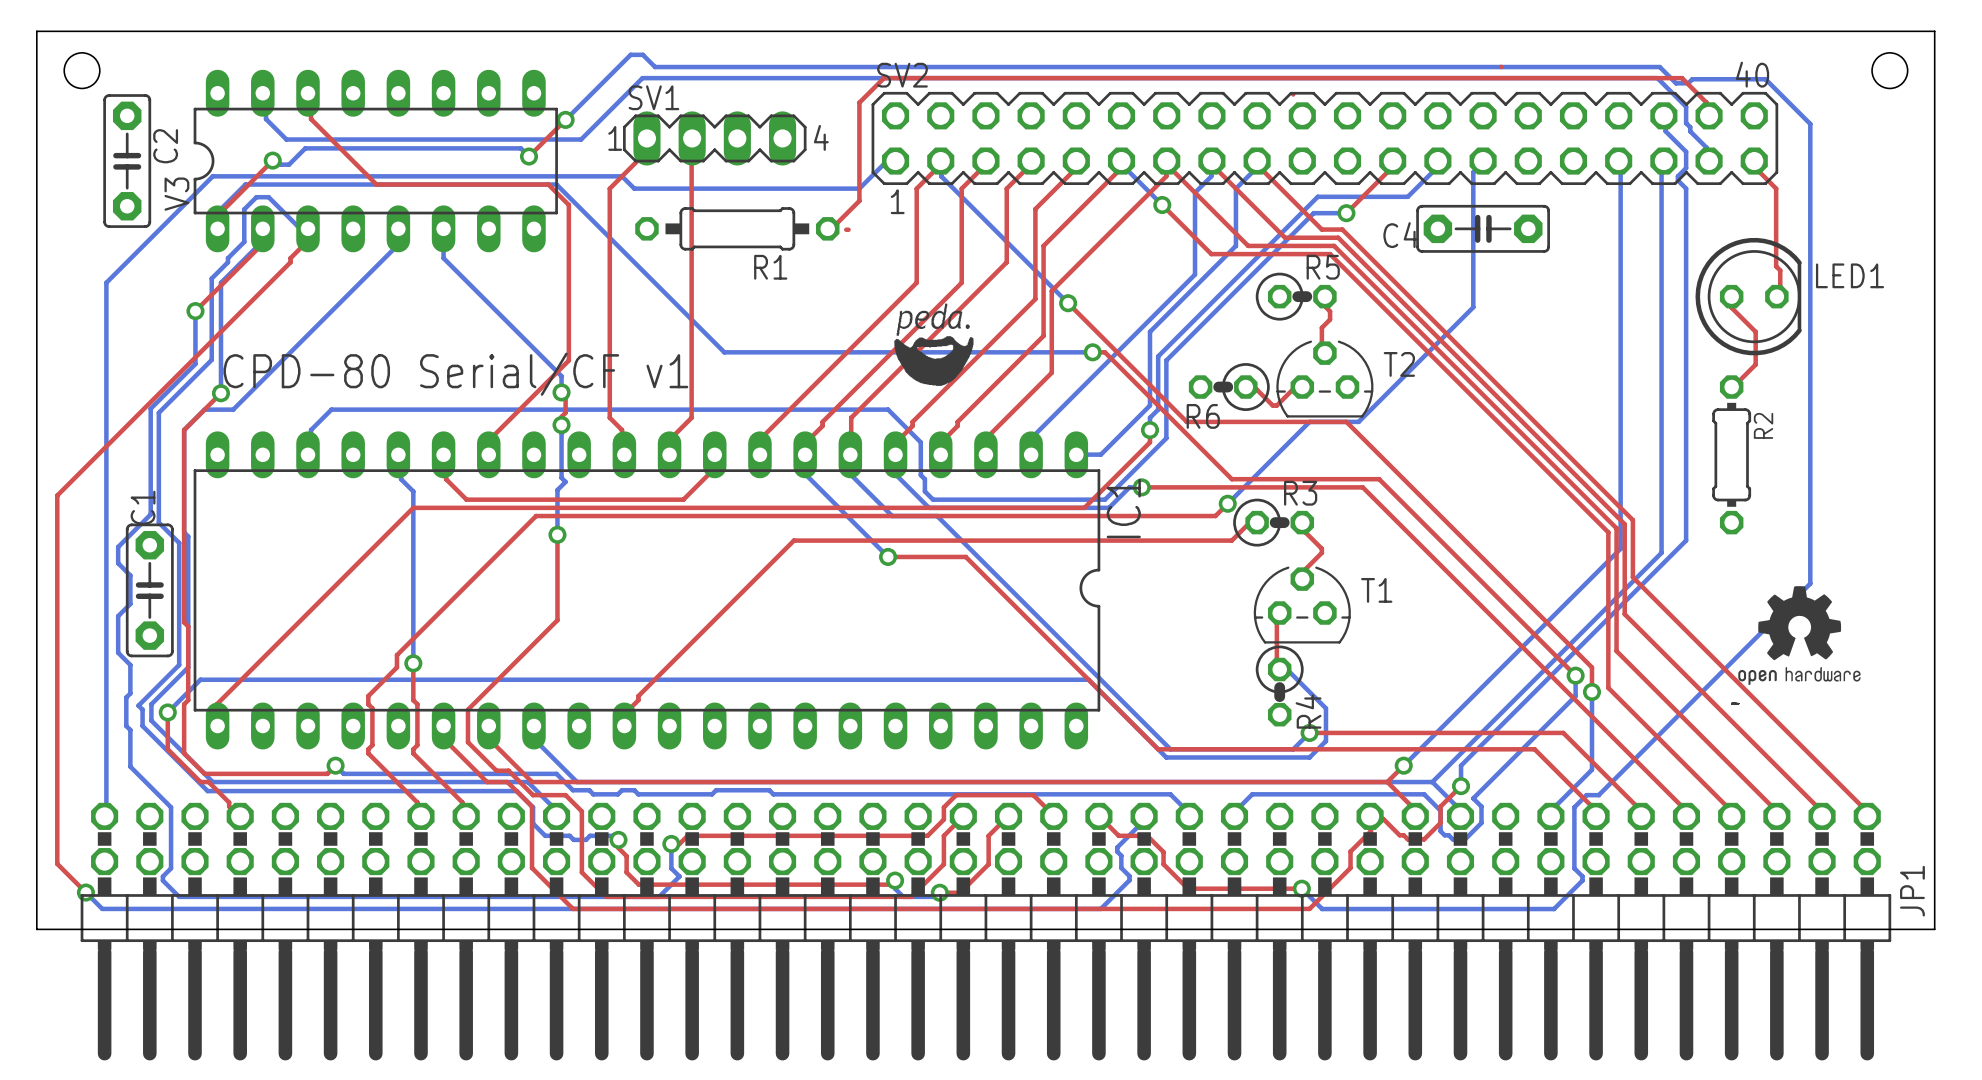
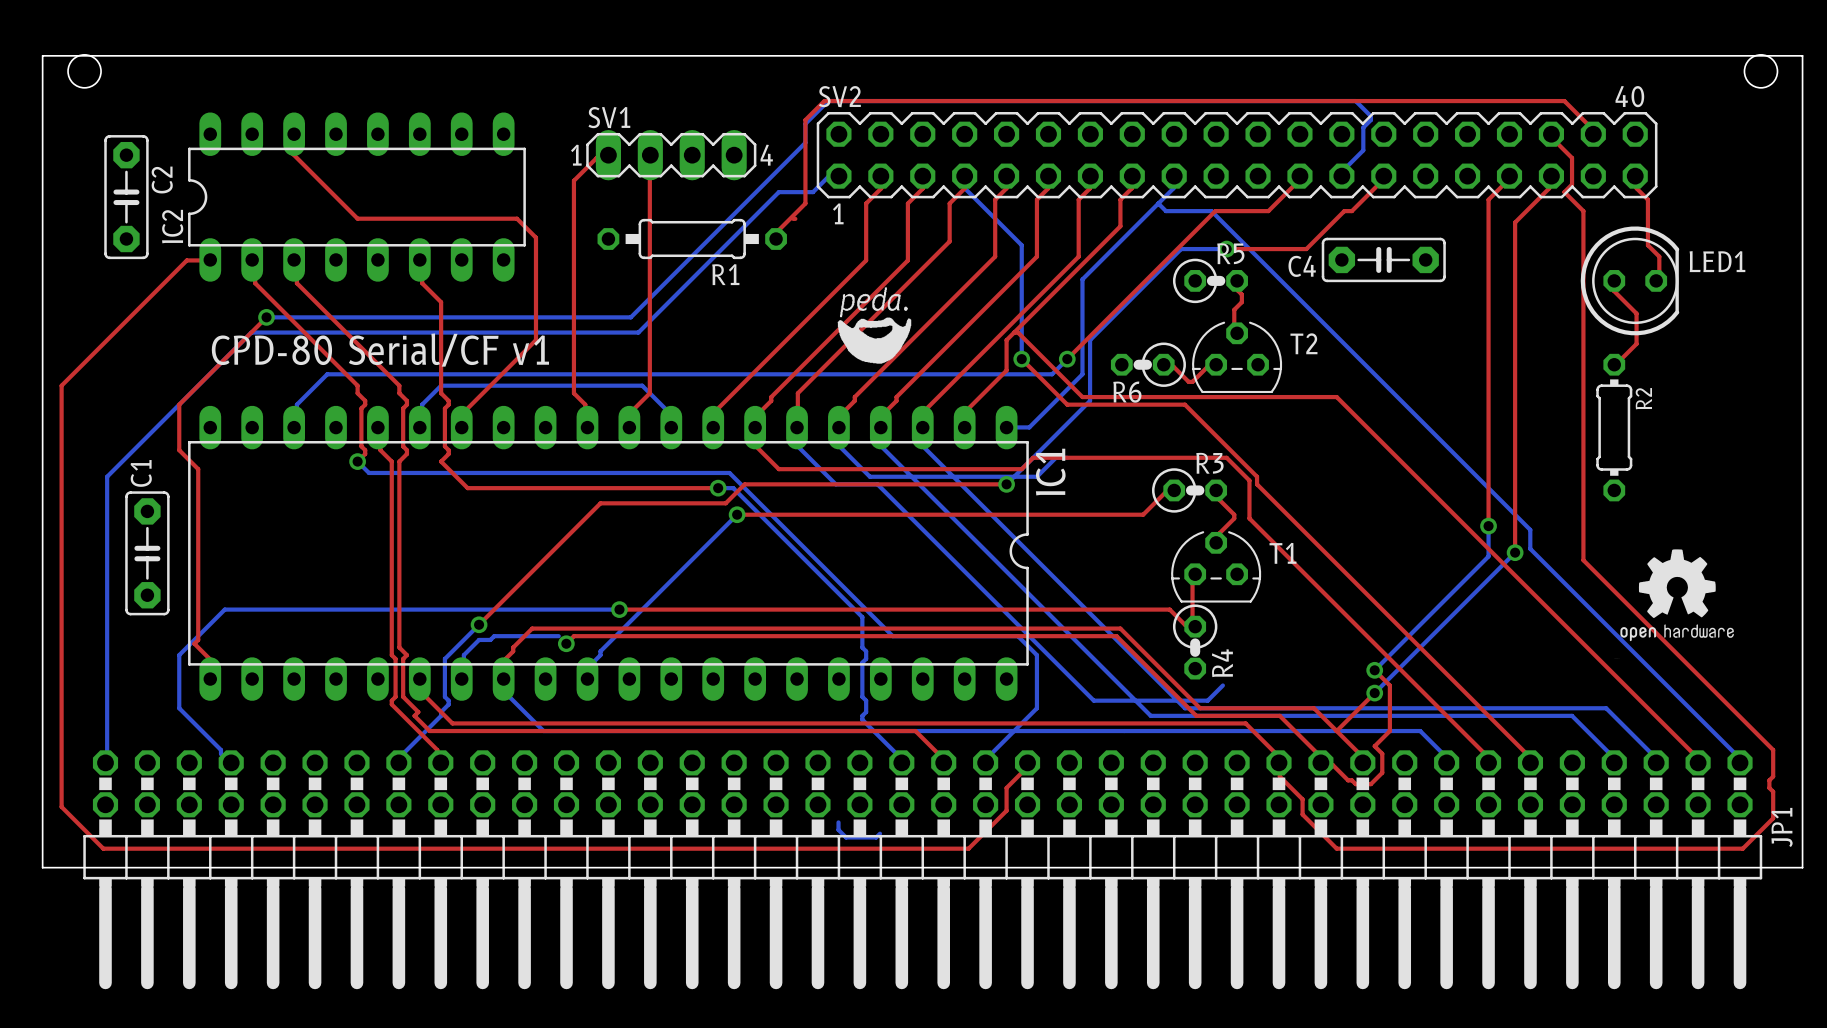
board edge: (36, 53) (36, 31) (1934, 31) (1934, 53) -> (42, 55) (1802, 55)
bottom track: (262, 93) (266, 94) (266, 119) (286, 139) (581, 139) (642, 78) (1657, 78) (1686, 106) (1686, 123) (1690, 127) (1690, 131) (1706, 147) (1706, 159) (1709, 161) -> none
top track: (307, 93) (311, 94) (311, 119) (376, 184) (548, 184) (568, 205) (568, 250) -> (294, 134) (293, 154) (357, 218) (517, 218) (535, 237)
bottom track: (1663, 115) (1665, 131) (1686, 151) (1686, 168) (1677, 176) (1677, 180) (1686, 188) (1686, 540) (1461, 765) (1461, 786) -> none
top track: (1709, 115) (1706, 114) (1706, 102) (1682, 78) (883, 78) (859, 102) (859, 123) -> (1593, 134) (1594, 131) (1564, 101) (824, 101) (805, 120)
top track: (565, 119) (529, 156) -> none
bottom track: (565, 119) (630, 54) (642, 54) (655, 67) (1659, 67) (1676, 83) (1688, 83) (1692, 79) (1765, 79) (1810, 123) (1810, 583) (1598, 795) (1586, 795) (1574, 807) (1574, 868) (1582, 876) (1582, 880) (1554, 909) (1322, 909) (1301, 888) -> none
via: (565, 119) -> none
SV1 position: (714, 138) -> (671, 155)
SV2 position: (1324, 138) -> (1237, 155)
bottom track: (529, 156) (520, 148) (305, 148) (289, 164) (280, 164) (276, 160) (272, 160) -> none
via: (529, 156) -> none
top track: (272, 160) (219, 213) (219, 225) (217, 228) -> none
via: (272, 160) -> none
C2 position: (127, 161) -> (126, 197)
V3: (375, 161) -> none
bottom track: (895, 161) (892, 164) (883, 164) (859, 188) (634, 188) (622, 176) (212, 176) (106, 282) (106, 507) -> none
top track: (940, 161) (941, 164) (916, 188) (916, 282) -> (880, 176) (881, 188) (866, 203) (866, 260) (858, 268)
bottom track: (940, 161) (941, 176) (1068, 303) -> none
top track: (985, 161) (986, 164) (961, 188) (961, 282) -> (922, 176) (923, 188) (907, 203) (907, 260) (900, 268)
top track: (1031, 161) (1031, 164) (1006, 188) (1006, 262) -> (964, 176) (964, 188) (949, 203) (949, 241) (942, 249)
top track: (1076, 161) (1076, 168) (1035, 209) (1035, 299) -> (1006, 176) (1006, 188) (995, 199) (995, 256) (968, 283)
top track: (1121, 161) (1125, 164) (1043, 245) (1043, 335) -> (1048, 176) (1048, 188) (1036, 199) (1036, 256) (976, 317)
bottom track: (1121, 161) (1121, 164) (1162, 205) -> none
top track: (1211, 161) (1211, 164) (1285, 237) (1338, 237) (1624, 524) -> (1551, 176) (1549, 176) (1549, 188) (1515, 222) (1515, 491)
bottom track: (1211, 161) (1211, 176) (1195, 192) (1195, 274) (1031, 438) (1031, 454) -> none
top track: (1257, 161) (1256, 164) (1321, 229) (1342, 229) (1632, 520) (1632, 577) (1866, 810) (1867, 816) -> none
bottom track: (1257, 161) (1260, 164) (1235, 188) (1235, 245) (1149, 331) (1149, 405) -> none
top track: (1392, 161) (1395, 164) (1346, 213) -> none
bottom track: (1437, 161) (1440, 164) (1407, 196) (1317, 196) (1158, 356) -> (1174, 176) (1173, 188) (1082, 279) (1082, 336)
bottom track: (1483, 161) (1473, 172) (1473, 307) (1358, 421) (1309, 421) (1227, 503) -> none
bottom track: (1618, 161) (1620, 164) (1620, 548) (1403, 765) -> none
bottom track: (1663, 161) (1661, 164) (1661, 552) (1624, 589) -> none
top track: (1754, 161) (1751, 164) (1776, 188) (1776, 266) -> (1635, 176) (1636, 188) (1647, 199) (1647, 245) (1655, 252)
top track: (1166, 164) (1166, 176) (1051, 290) (1051, 372) -> (1090, 176) (1090, 188) (1078, 199) (1078, 256) (983, 351)
top track: (1166, 164) (1248, 245) (1334, 245) (1616, 528) (1616, 651) (1776, 810) (1776, 816) -> none
bottom track: none -> (964, 176) (964, 188) (1021, 245) (1021, 359)
top track: none -> (1132, 176) (1131, 188) (1120, 199) (1120, 226) (1006, 340) (1006, 370) (964, 412) (964, 427)
top track: none -> (1299, 176) (1302, 176) (1268, 211) (1215, 211) (1067, 359)
bottom track: none -> (1341, 176) (1340, 173) (1363, 150) (1363, 127) (1370, 120) (1370, 116) (1355, 101) (828, 101) (805, 123) (805, 142) (630, 317) (266, 317)
top track: none -> (1383, 176) (1386, 176) (1351, 211) (1344, 211) (1306, 249) (1226, 249)
top track: none -> (1509, 176) (1507, 180) (1488, 199) (1488, 526)
top track: (859, 200) (834, 225) (830, 225) (827, 228) -> (805, 192) (805, 203) (778, 230) (778, 237) (776, 238)
top track: (1162, 205) (1211, 254) (1330, 254) (1608, 532) (1608, 687) (1731, 810) (1731, 816) -> none
via: (1162, 205) -> none
IC2: none -> (356, 197)
bottom track: none -> (1158, 203) (1165, 211) (1211, 211) (1530, 529) (1530, 548) (1739, 757) (1740, 762)
bottom track: (1346, 213) (1313, 213) (1264, 262) -> (1226, 249) (1181, 249)
via position: (1346, 213) -> (1226, 249)
bottom track: (220, 225) (220, 209) (245, 184) (556, 184) (724, 352) (1092, 352) -> none
top track: (262, 228) (260, 229) (260, 246) (195, 311) -> none
bottom track: (307, 228) (305, 225) (297, 225) (268, 197) (256, 197) (244, 209) (244, 241) (211, 278) (211, 359) (158, 412) (158, 522) (179, 542) (179, 664) (138, 705) (142, 709) (142, 726) (207, 791) (516, 791) (533, 807) (533, 823) (545, 835) (569, 835) (573, 839) (585, 839) (590, 835) (614, 835) (618, 839) -> none
bottom track: (398, 228) (396, 245) (233, 409) (204, 409) -> (838, 176) (828, 176) (813, 192) (778, 192) (638, 332) (251, 332) (198, 385)
bottom track: (443, 228) (443, 258) (561, 376) (561, 392) -> none
R1 position: (737, 228) -> (692, 238)
C4 position: (1483, 228) -> (1383, 259)
bottom track: (261, 229) (261, 241) (220, 282) (220, 393) -> none
top track: (306, 229) (306, 241) (290, 258) (290, 262) (57, 495) -> (210, 259) (186, 260) (61, 385) (61, 465)
top track: none -> (252, 259) (255, 260) (255, 283) (357, 385) (357, 393) (365, 400) (365, 404) (361, 408) (361, 446) (365, 450) (365, 453) (357, 461)
top track: none -> (419, 259) (422, 260) (422, 283) (441, 302) (441, 393) (448, 400) (448, 404) (444, 408) (444, 446) (448, 450) (448, 453) (441, 461) (467, 488) (718, 488)
top track: (1068, 303) (1186, 421) -> (1014, 332) (1017, 332) (1082, 397) (1109, 397)
via: (1068, 303) -> none
bottom track: (195, 311) (195, 363) (150, 408) (150, 514) (118, 547) (118, 563) (130, 575) (130, 603) (118, 616) (118, 652) (130, 664) (130, 693) (126, 697) (126, 726) (130, 730) (130, 766) (171, 807) (171, 868) (162, 876) (162, 880) (179, 896) (659, 896) (679, 876) (671, 868) (671, 843) -> none
via: (195, 311) -> none
top track: none -> (266, 317) (213, 370)
via: none -> (266, 317)
top track: (1092, 352) (1104, 352) (1231, 479) (1379, 479) (1575, 675) -> none
via: (1092, 352) -> none
via: none -> (1021, 359)
bottom track: none -> (1067, 359) (1052, 374) (327, 374) (315, 385)
via: none -> (1067, 359)
top track: (561, 392) (565, 396) (565, 412) (561, 416) (561, 424) -> none
via: (561, 392) -> none
via: (220, 393) -> none
bottom track: (1158, 397) (1158, 409) (1149, 417) (1149, 430) -> (1082, 374) (1074, 381)
bottom track: (331, 409) (466, 409) -> (419, 427) (422, 427) (422, 404) (441, 385)
bottom track: (683, 409) (888, 409) (920, 442) (920, 475) (924, 479) (924, 491) (933, 499) (1104, 499) (1166, 438) (1166, 425) -> (1006, 484) (1090, 400)
bottom track: none -> (642, 385) (668, 412) (668, 427) (671, 427)
top track: (1346, 421) (1591, 667) (1591, 692) -> (1257, 397) (1336, 397) (1515, 575)
bottom track: (561, 424) (565, 429) (561, 433) (561, 477) (565, 481) (557, 490) (557, 534) -> none
via: (561, 424) -> none
bottom track: (184, 430) (184, 532) (188, 536) (188, 667) (151, 704) (151, 720) (212, 782) (527, 782) (556, 810) (556, 816) -> (179, 404) (107, 476)
top track: (1149, 430) (1149, 442) (1104, 487) -> (1067, 457) (1033, 457)
via: (1149, 430) -> none
top track: none -> (377, 427) (380, 431) (380, 450) (391, 461) (391, 620)
bottom track: (398, 454) (401, 458) (401, 479) (413, 491) (413, 663) -> none
top track: (443, 454) (446, 458) (446, 479) (466, 499) (683, 499) (712, 471) (712, 458) (714, 454) -> none
bottom track: (805, 454) (806, 475) (888, 556) -> none
bottom track: none -> (880, 427) (881, 446) (1150, 715) (1572, 715) (1613, 757) (1614, 762)
bottom track: none -> (922, 427) (923, 446) (1184, 708)
top track: (184, 479) (184, 622) (188, 626) (188, 700) (184, 704) (184, 753) (204, 773) (327, 773) (335, 765) -> (179, 450) (198, 469) (198, 639) (194, 643) (209, 658)
via: (1141, 487) -> none
top track: (1313, 487) (1362, 487) (1686, 810) (1686, 816) -> (1226, 457) (1249, 480) (1249, 518) (1431, 700)
via: none -> (357, 461)
top track: (1092, 499) (1084, 507) (413, 507) (216, 704) -> (1021, 469) (778, 469) (756, 446) (755, 427)
top track: (1227, 503) (1215, 516) (1076, 516) -> none
via: (1227, 503) -> none
top track: (793, 516) (536, 516) (396, 655) (396, 667) (368, 696) (368, 704) (372, 708) (372, 745) (368, 749) (368, 753) (417, 802) (417, 814) (420, 816) -> (744, 484) (725, 503) (600, 503) (479, 624)
via: none -> (1006, 484)
bottom track: none -> (718, 488) (733, 488) (862, 617) (862, 647) (866, 651) (866, 658) (862, 662) (862, 696) (866, 700) (866, 712) (862, 715) (862, 719) (904, 761) (901, 762)
via: none -> (718, 488)
top track: (557, 534) (557, 620) (467, 709) (467, 742) (496, 770) (508, 770) (533, 795) (565, 795) (581, 811) (581, 872) (606, 896) (911, 896) (943, 864) (943, 835) (963, 816) -> none
via: (557, 534) -> none
top track: (1231, 540) (793, 540) (638, 696) (638, 700) (626, 712) (626, 724) (624, 726) -> (1150, 507) (1143, 514) (737, 514)
bottom track: none -> (737, 514) (600, 651) (600, 655) (589, 666) (587, 679)
via: none -> (737, 514)
top track: (888, 556) (965, 556) (1158, 749) (1534, 749) -> none
via: (888, 556) -> none
bottom track: none -> (1488, 526) (1488, 556) (1374, 670)
via: none -> (1488, 526)
top track: (1624, 589) (1624, 614) -> none
via: none -> (1515, 552)
top track: none -> (619, 609) (1169, 609) (1184, 624) (1192, 624)
bottom track: none -> (619, 609) (224, 609) (179, 655) (179, 708) (231, 762)
via: none -> (619, 609)
via: (413, 663) -> none
bottom track: none -> (479, 624) (444, 658) (444, 696) (448, 700) (448, 704) (441, 712) (441, 715) (399, 757) (398, 762)
via: none -> (479, 624)
bottom track: (1279, 669) (1280, 671) (1289, 671) (1325, 708) (1325, 741) (1309, 757) -> (1656, 762) (1655, 757) (1606, 708) (1222, 708)
bottom track: (1575, 675) (1575, 696) (1473, 798) (1481, 806) (1481, 822) (1465, 839) (1452, 839) (1440, 831) (1440, 810) (1424, 794) (1252, 794) (1231, 814) (1234, 816) -> none
via: (1575, 675) -> none
bottom track: (523, 679) (200, 679) (167, 712) -> (494, 636) (490, 639) (479, 639) (463, 655) (463, 677) (461, 679)
bottom track: (593, 679) (953, 679) -> (357, 461) (369, 472) (729, 472) (892, 636)
top track: none -> (566, 643) (573, 636) (1116, 636) (1196, 715) (1279, 715) (1295, 731)
via: none -> (566, 643)
bottom track: (1591, 692) (1591, 769) (1551, 810) (1550, 816) -> (1336, 731) (1420, 731) (1443, 753) (1443, 761) (1446, 762)
via: (1591, 692) -> none
bottom track: (1109, 700) (1166, 757) (1268, 757) -> (1036, 655) (1036, 708) (983, 761) (985, 762)
top track: (167, 712) (167, 749) (200, 782) (208, 782) (229, 802) (229, 806) (240, 816) -> none
via: (167, 712) -> none
top track: none -> (1374, 670) (1389, 685) (1389, 731) (1374, 746) (1382, 753) (1382, 772) (1370, 784) (1355, 784) (1351, 780) (1348, 780) (1332, 765) (1321, 765) (1320, 762)
via: none -> (1374, 670)
top track: (488, 726) (491, 728) (491, 741) (532, 782) -> (479, 731) (501, 731)
top track: none -> (503, 679) (505, 677) (505, 658) (513, 651) (513, 647) (532, 628) (1120, 628) (1200, 708) (1313, 708) (1359, 753) (1359, 761) (1362, 762)
top track: (1309, 732) (1563, 732) -> (1021, 359) (1067, 404) (1184, 404) (1257, 476) (1257, 484) (1458, 685)
via: (1309, 732) -> none
top track: none -> (1374, 693) (1336, 731)
bottom track: (1473, 741) (1432, 782) (1456, 806) (1456, 814) (1460, 816) -> none
via: none -> (1374, 693)
bottom track: (335, 765) (343, 773) (556, 773) (572, 790) (589, 790) (593, 794) (617, 794) (622, 790) (634, 790) (638, 794) (712, 794) (716, 790) (769, 790) (773, 794) (1170, 794) (1190, 814) (1189, 816) -> none
via: (335, 765) -> none
top track: (1403, 765) (1387, 782) (978, 782) -> none
via: (1403, 765) -> none
top track: (478, 773) (487, 782) -> (294, 259) (296, 260) (296, 283) (399, 385) (399, 393) (406, 400) (406, 404) (403, 408) (403, 446) (406, 450) (406, 453) (399, 461) (399, 647) (406, 655) (403, 658) (403, 696) (418, 712) (414, 715) (429, 731) (460, 731)
top track: none -> (452, 723) (1245, 723) (1276, 753) (1276, 761) (1279, 762)
top track: (507, 782) (532, 806) (532, 867) (572, 908) -> (88, 833) (103, 848) (539, 848)
top track: (1461, 786) (1440, 806) (1440, 822) (1424, 839) (1407, 839) (1403, 835) (1399, 835) (1383, 818) (1370, 818) -> none
via: (1461, 786) -> none
top track: (1008, 816) (988, 835) (988, 864) (960, 892) (939, 892) -> (943, 762) (945, 761) (915, 731)
top track: (1053, 816) (1033, 795) (956, 795) (943, 807) (943, 819) (927, 835) (687, 835) (679, 843) (671, 843) -> none
top track: (1098, 816) (1118, 835) (1147, 835) (1163, 852) (1163, 864) (1187, 888) (1301, 888) -> (1027, 762) (1029, 765) (1006, 787) (1006, 810) (968, 848)
bottom track: (1144, 816) (1145, 818) (1117, 847) (1117, 851) (1121, 855) (1121, 867) (1129, 876) (1129, 880) (1100, 908) (102, 908) (85, 892) -> none
top track: (1370, 831) (1350, 851) (1350, 867) (1309, 908) (1035, 908) -> (1279, 776) (1302, 799) (1302, 814) (1336, 848) (1742, 848) (1773, 818) (1773, 791) (1769, 787) (1769, 780) (1773, 776) (1773, 750) (1583, 560) (1583, 211) (1564, 192) (1572, 184) (1572, 157) (1553, 139) (1551, 134)
top track: (618, 839) (618, 848) (626, 856) (626, 872) (638, 884) (891, 884) (895, 880) -> none
via: (618, 839) -> none
via: (671, 843) -> none
via: (895, 880) -> none
via: (1301, 888) -> none
via: (85, 892) -> none
via: (939, 892) -> none

